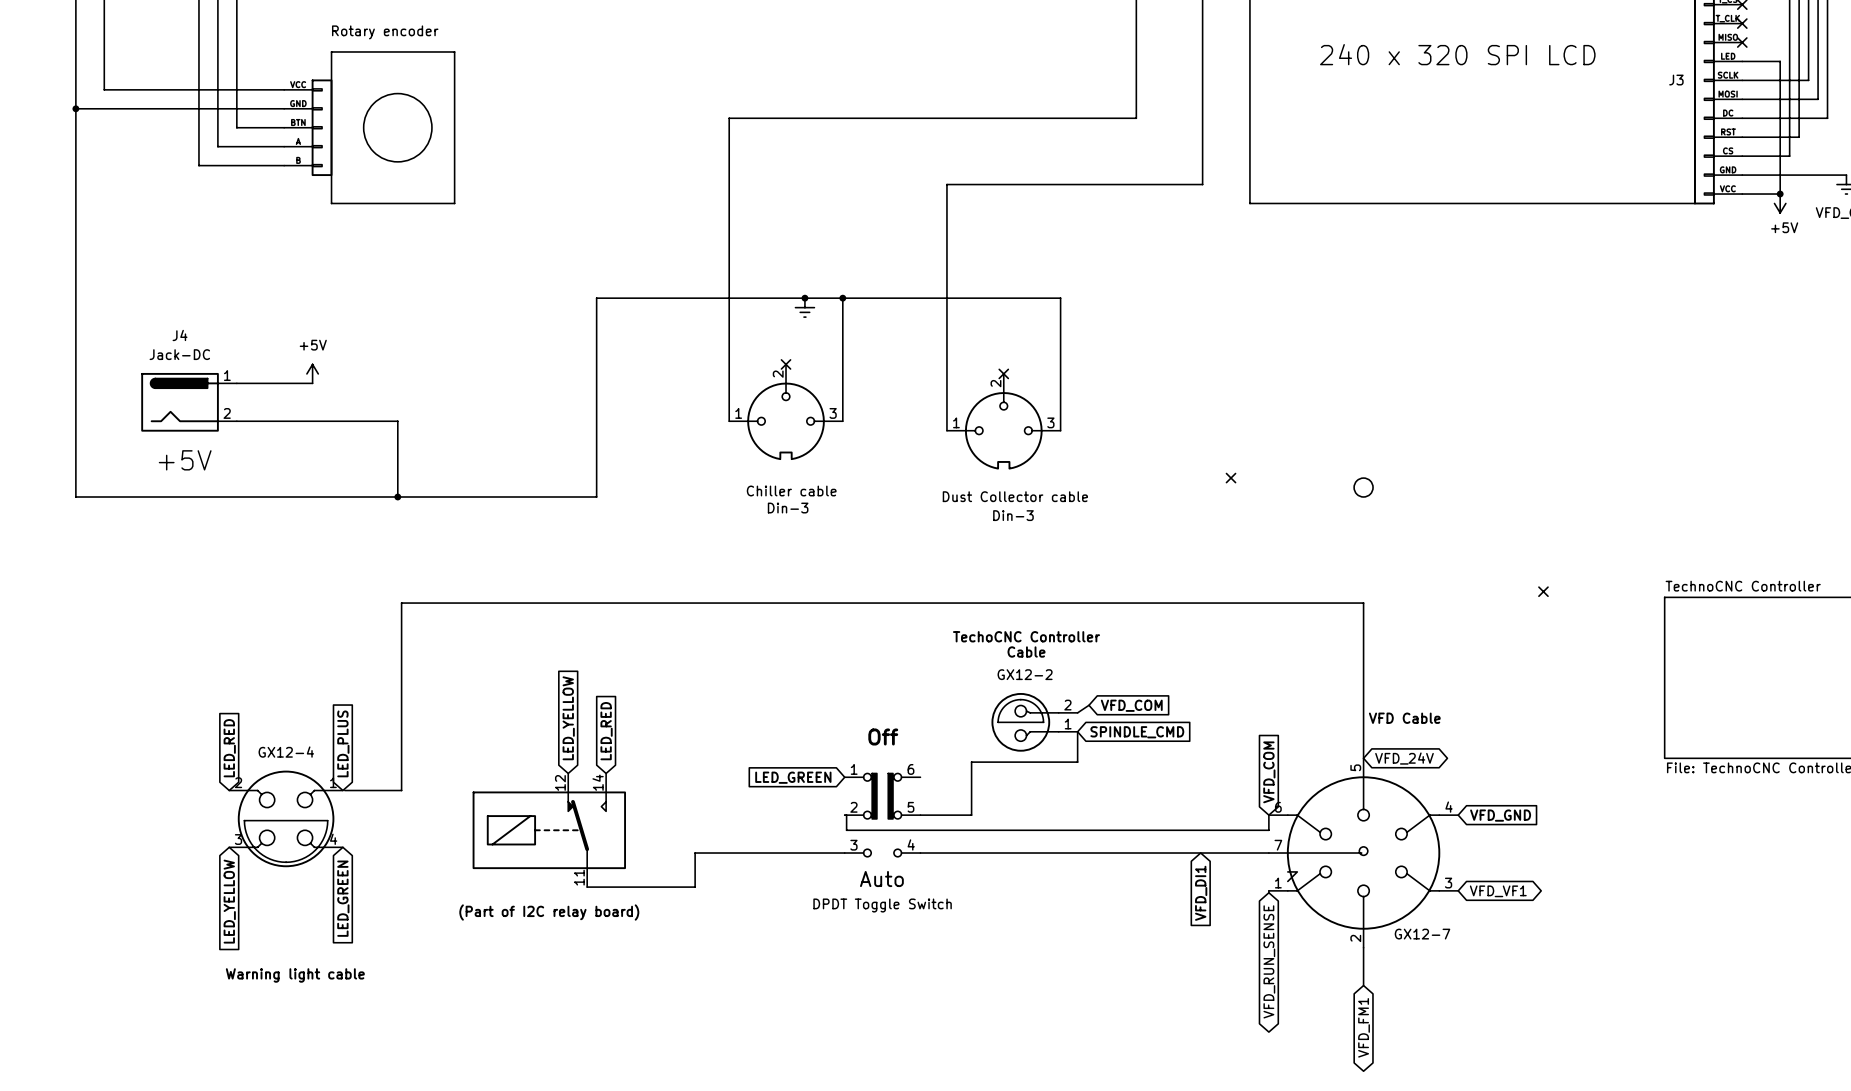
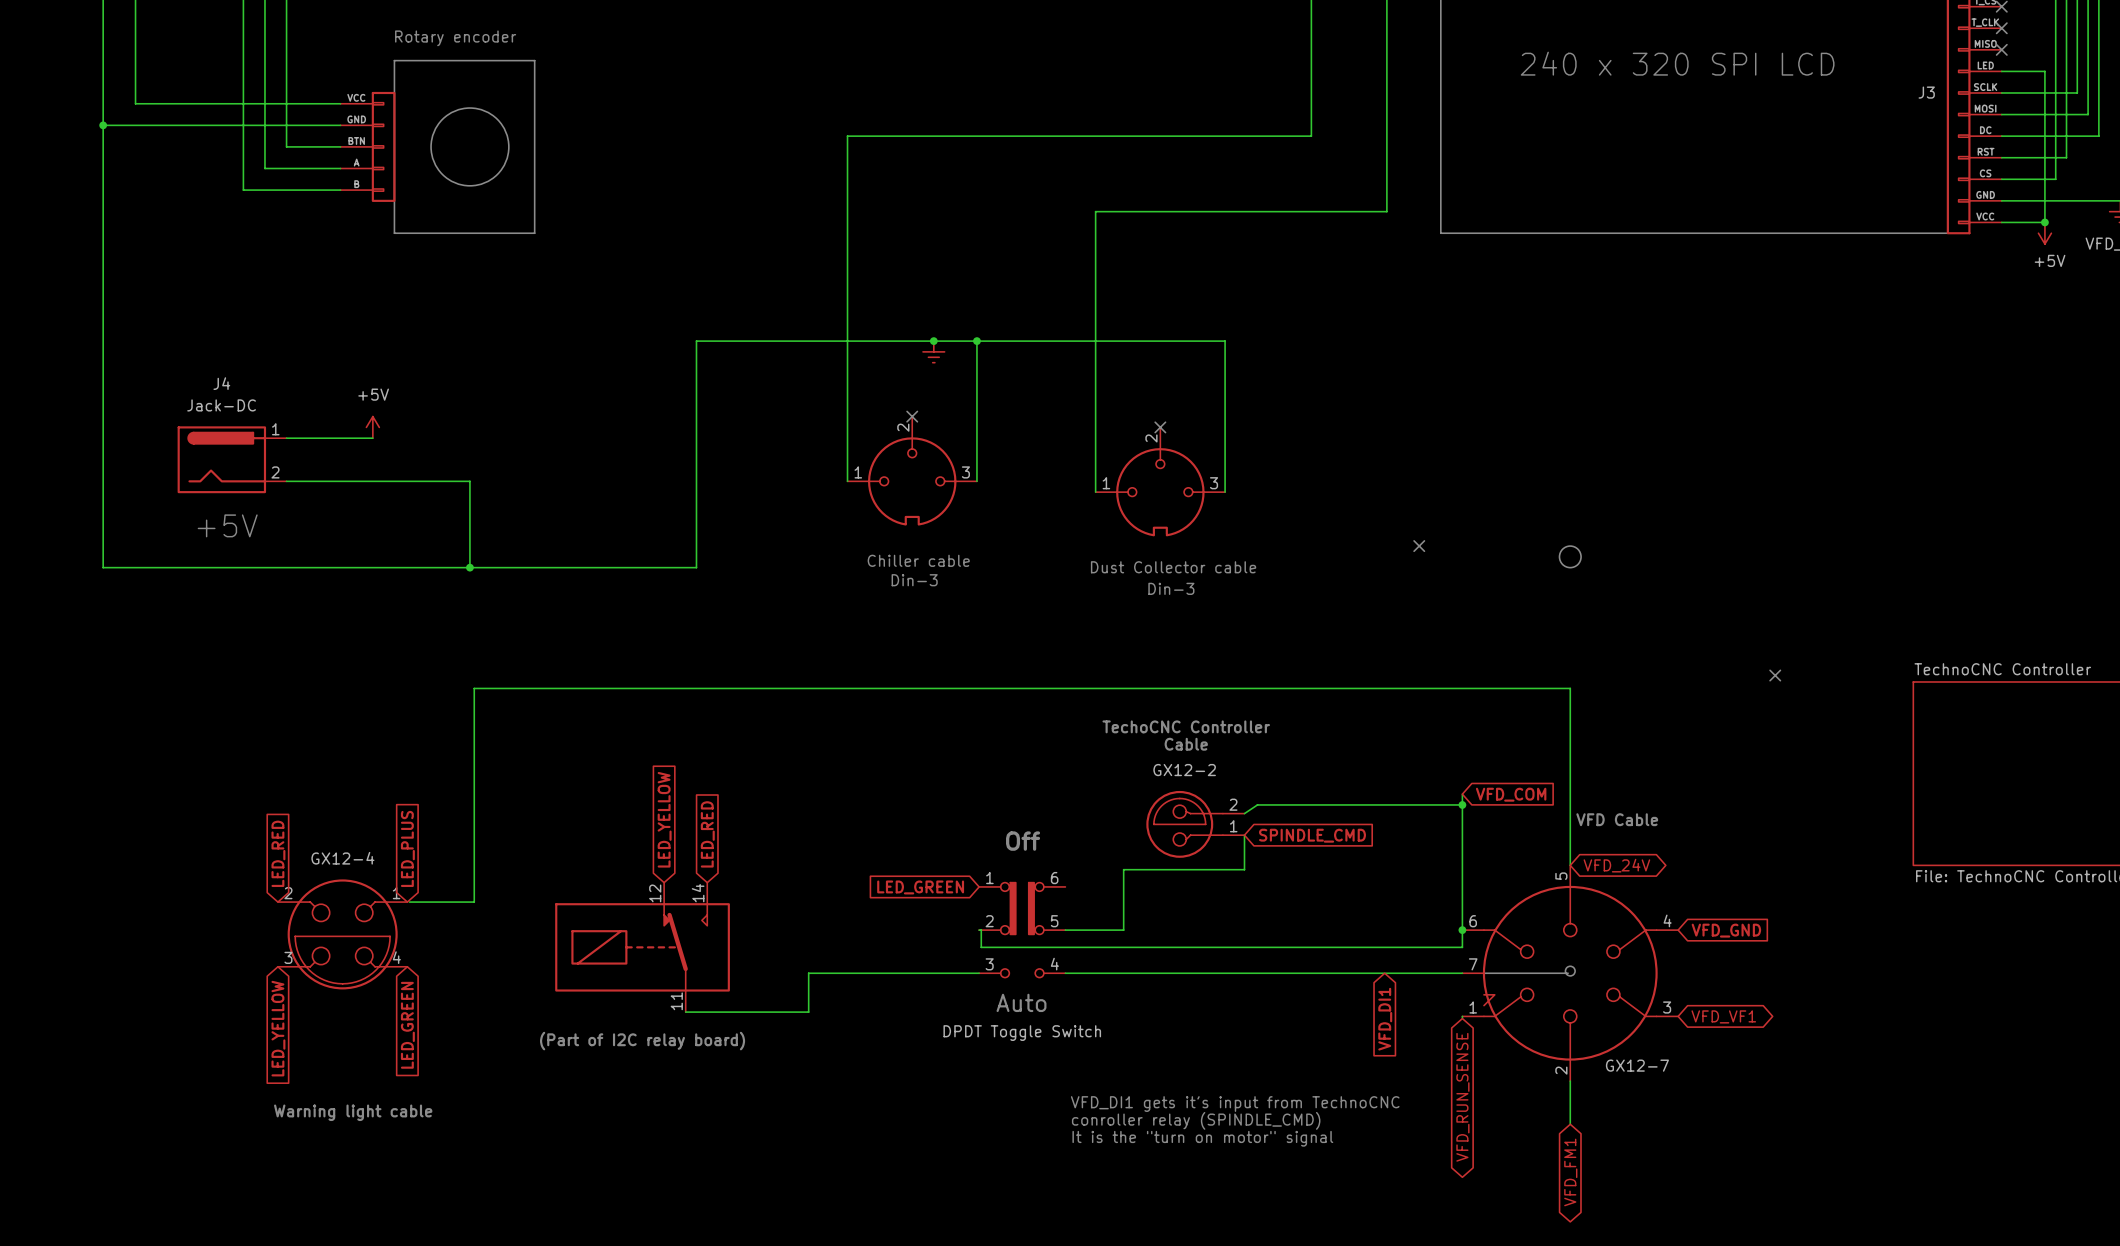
wire: none -> (1462, 794) (1462, 930)
global label: none -> VFD_COM (1511, 794)
wire: none -> (1257, 804) (1462, 804)
global label: VFD_COM (1131, 705) -> none
junction: none -> (1462, 804)
global label: VFD_COM (1269, 772) -> none
junction: none -> (1462, 930)
text: none -> VFD_DI1 gets it's input from TechnoCNC (1235, 1104)
text: none -> conroller relay (SPINDLE_CMD) (1196, 1120)
text: none -> It is the "turn on motor" signal (1202, 1138)

